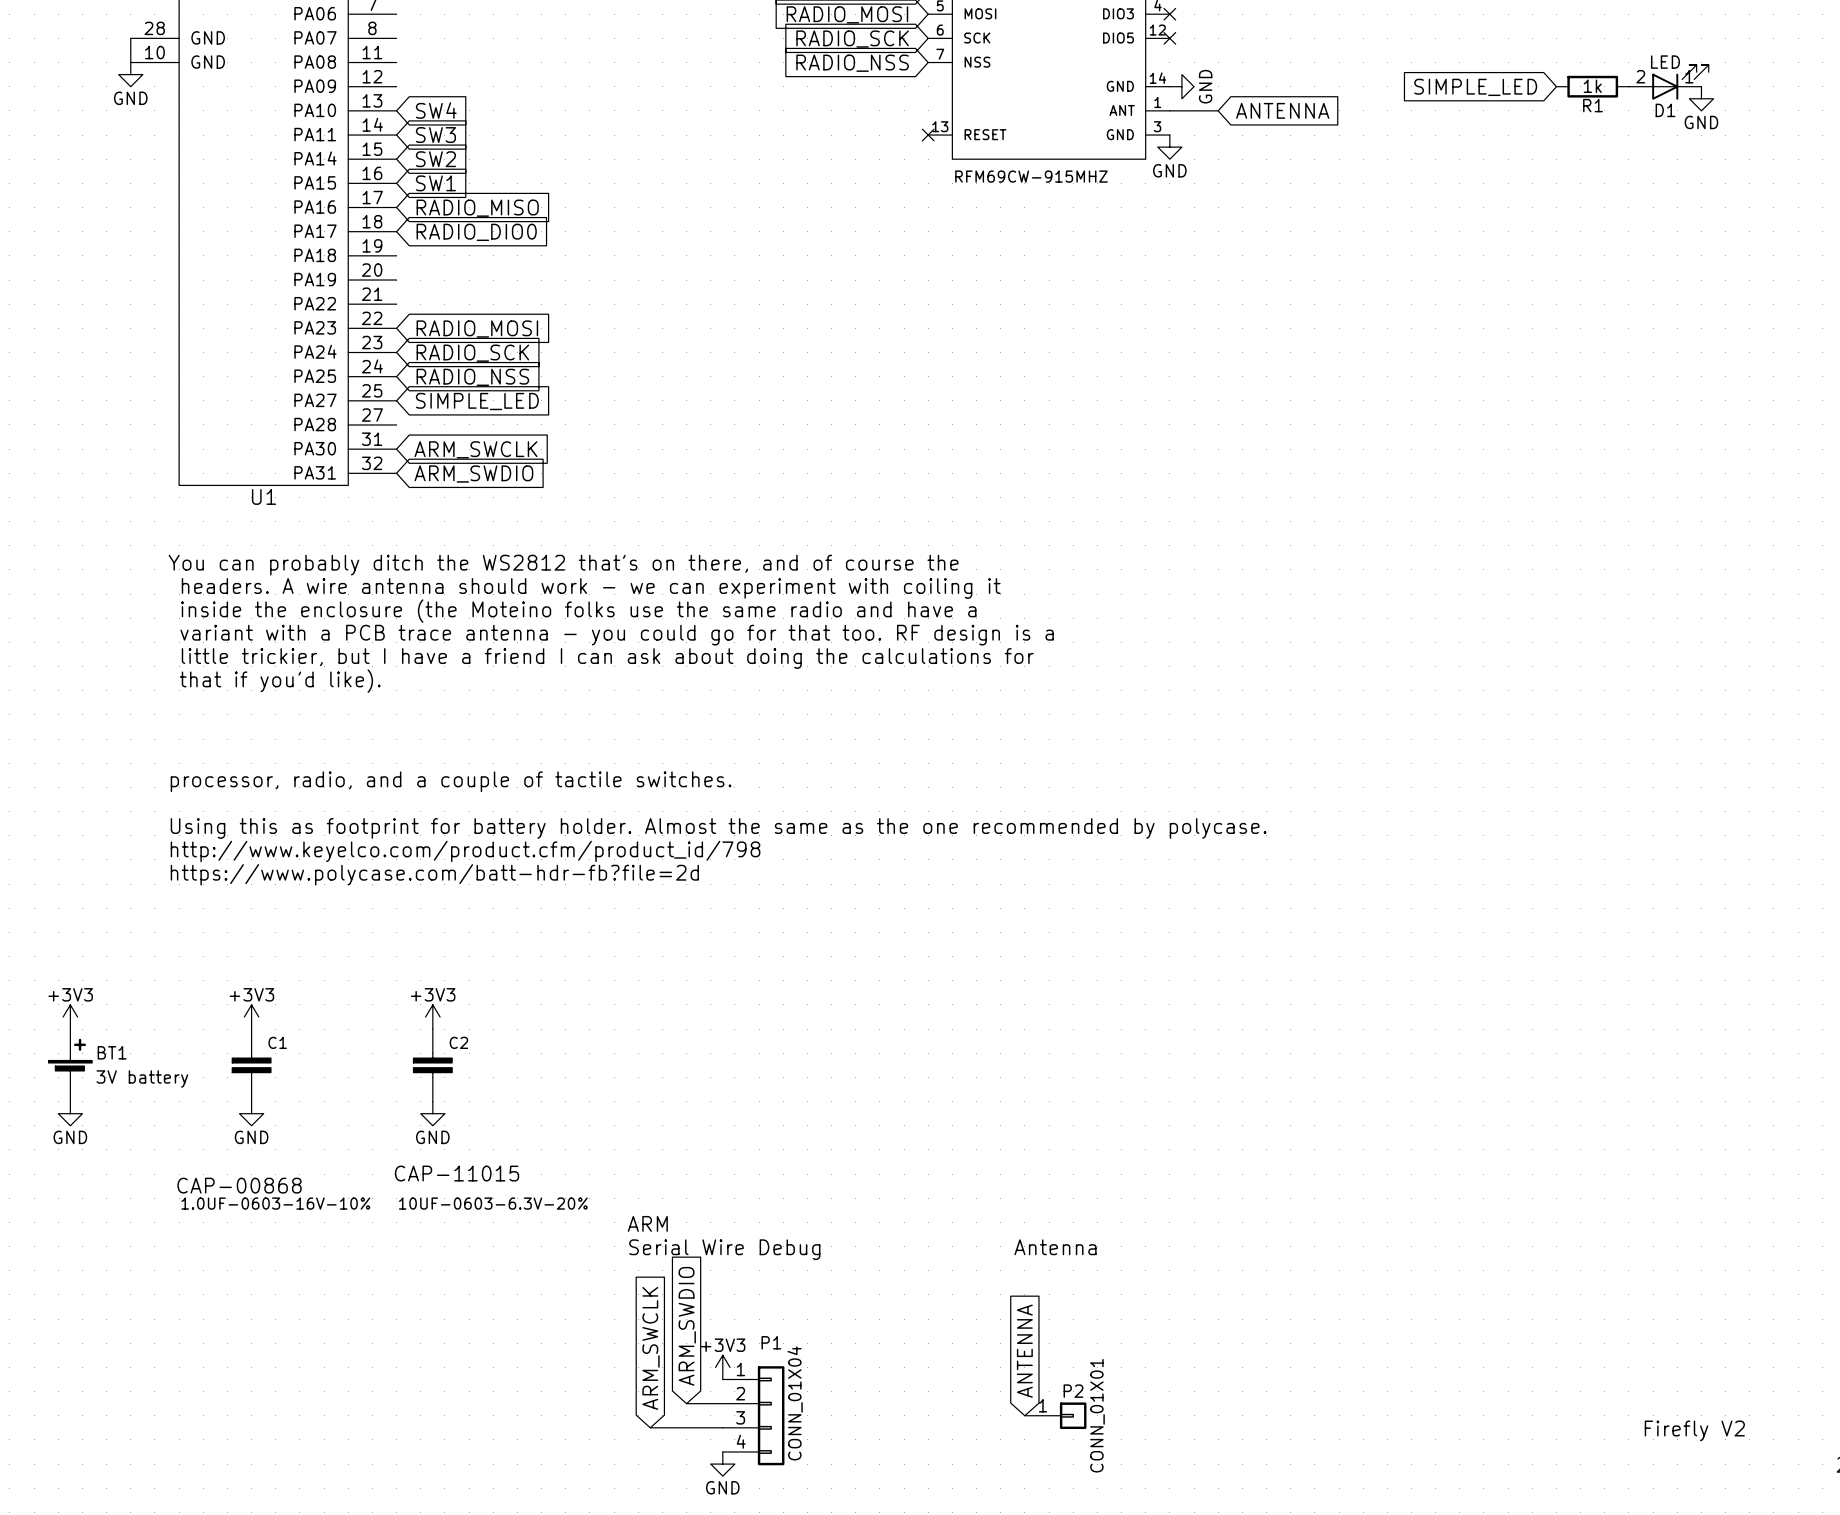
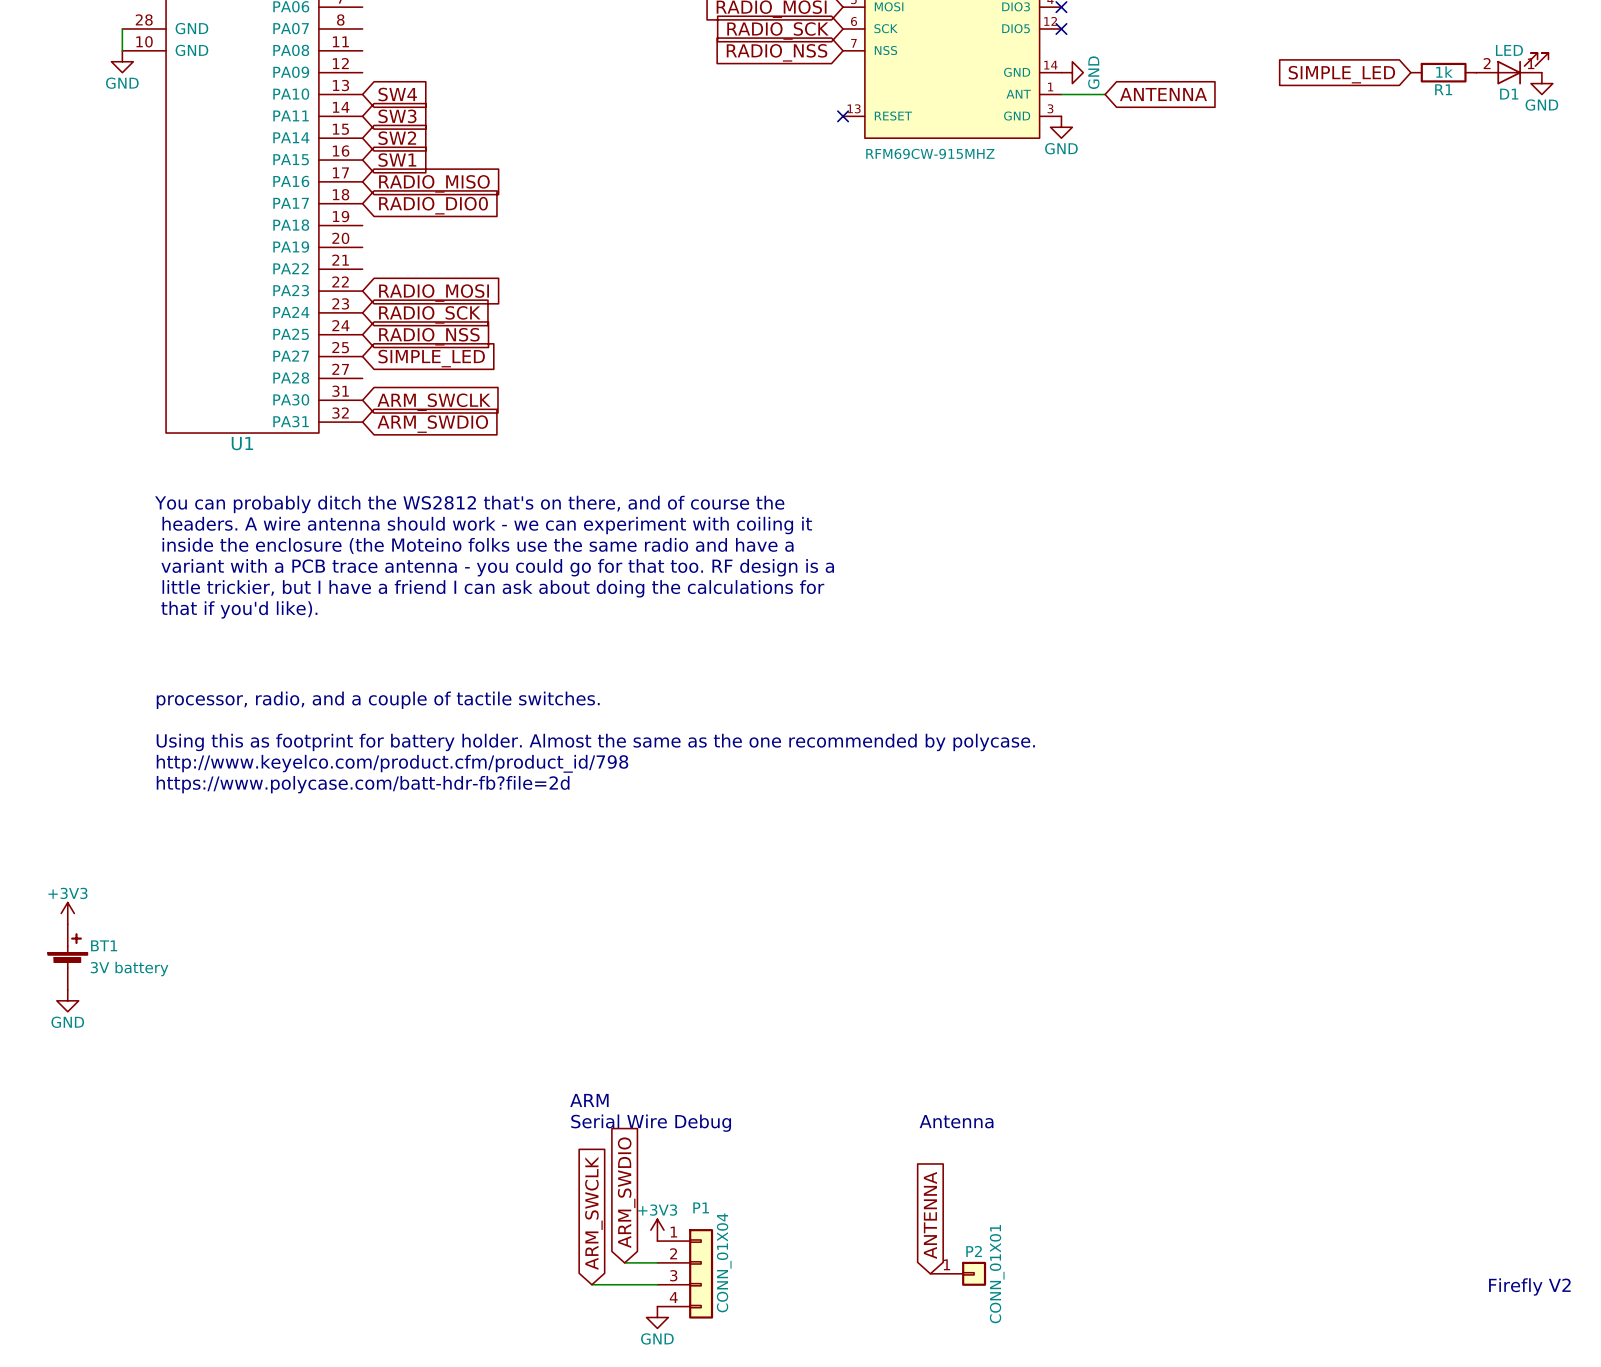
power symbol: +3V3 (251, 1017) -> none
power symbol: +3V3 (432, 1017) -> none
C1: 1.0UF-0603-16V-10% (251, 1065) -> none
C2: 10UF-0603-6.3V-20% (432, 1065) -> none
power symbol: GND (251, 1113) -> none
power symbol: GND (432, 1113) -> none

